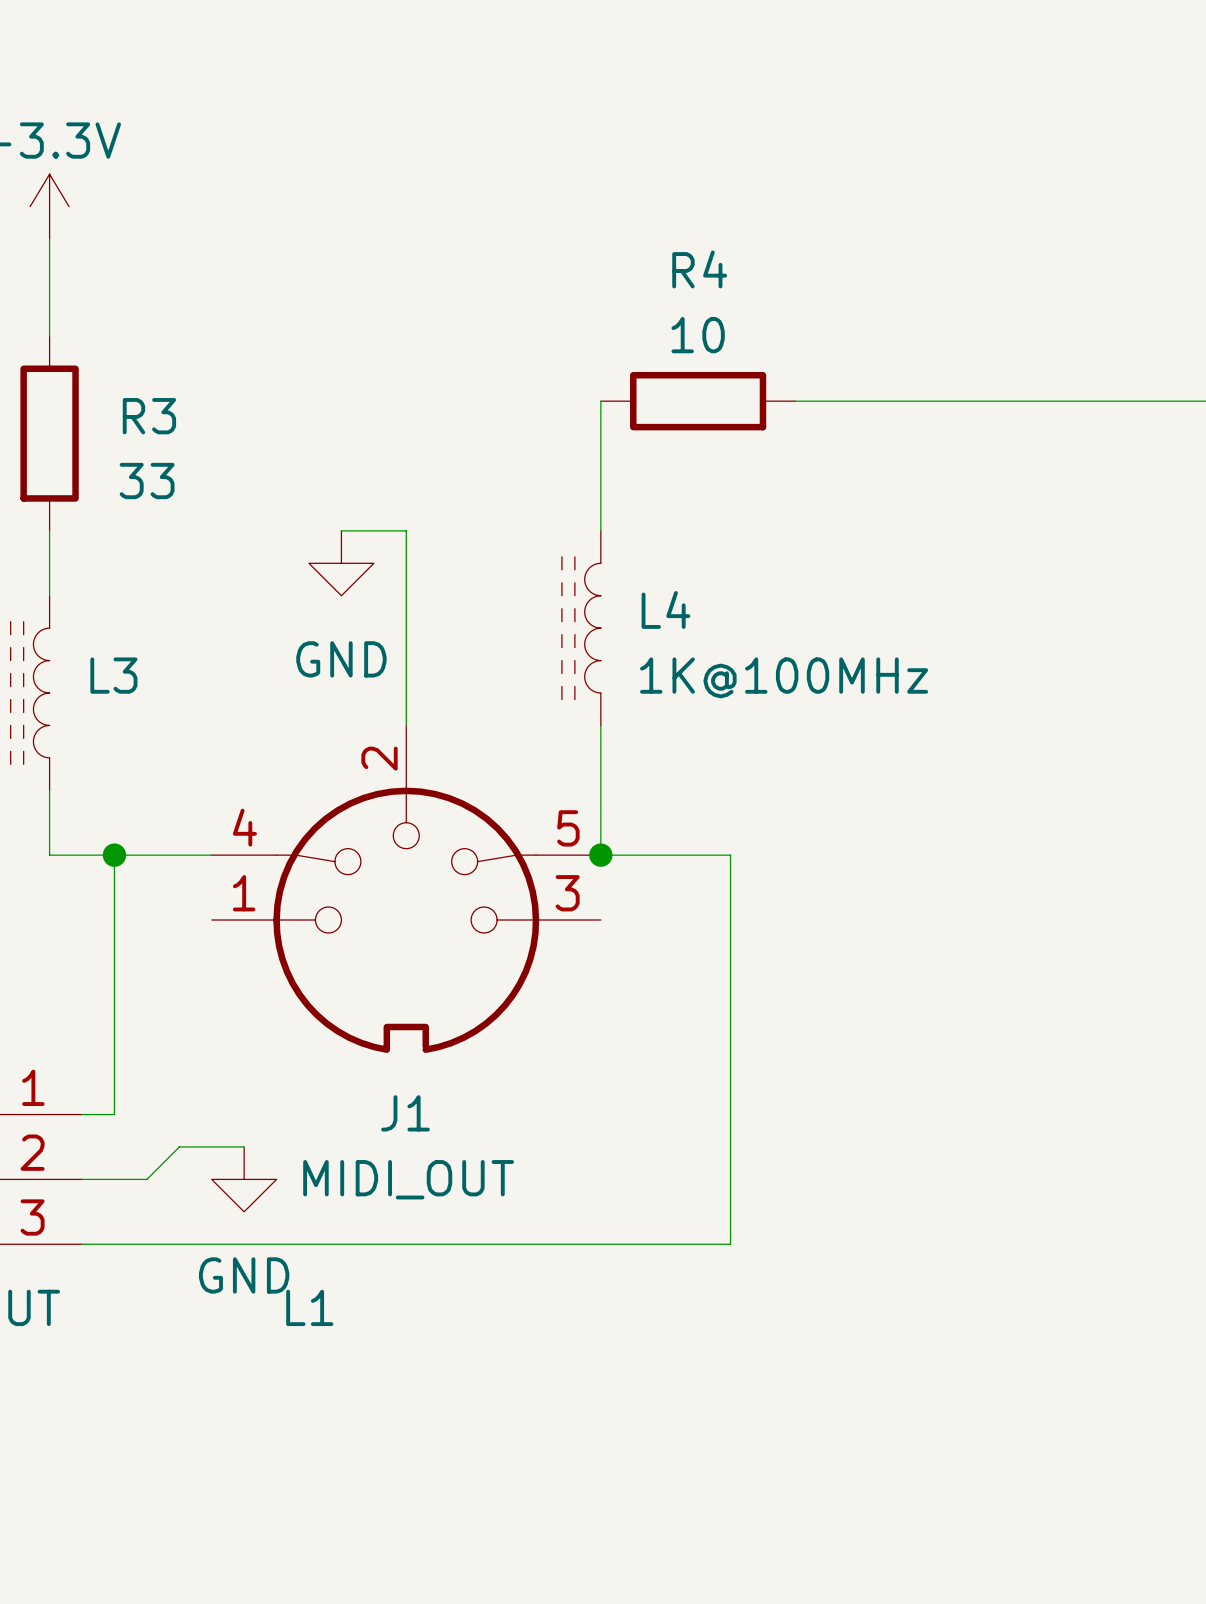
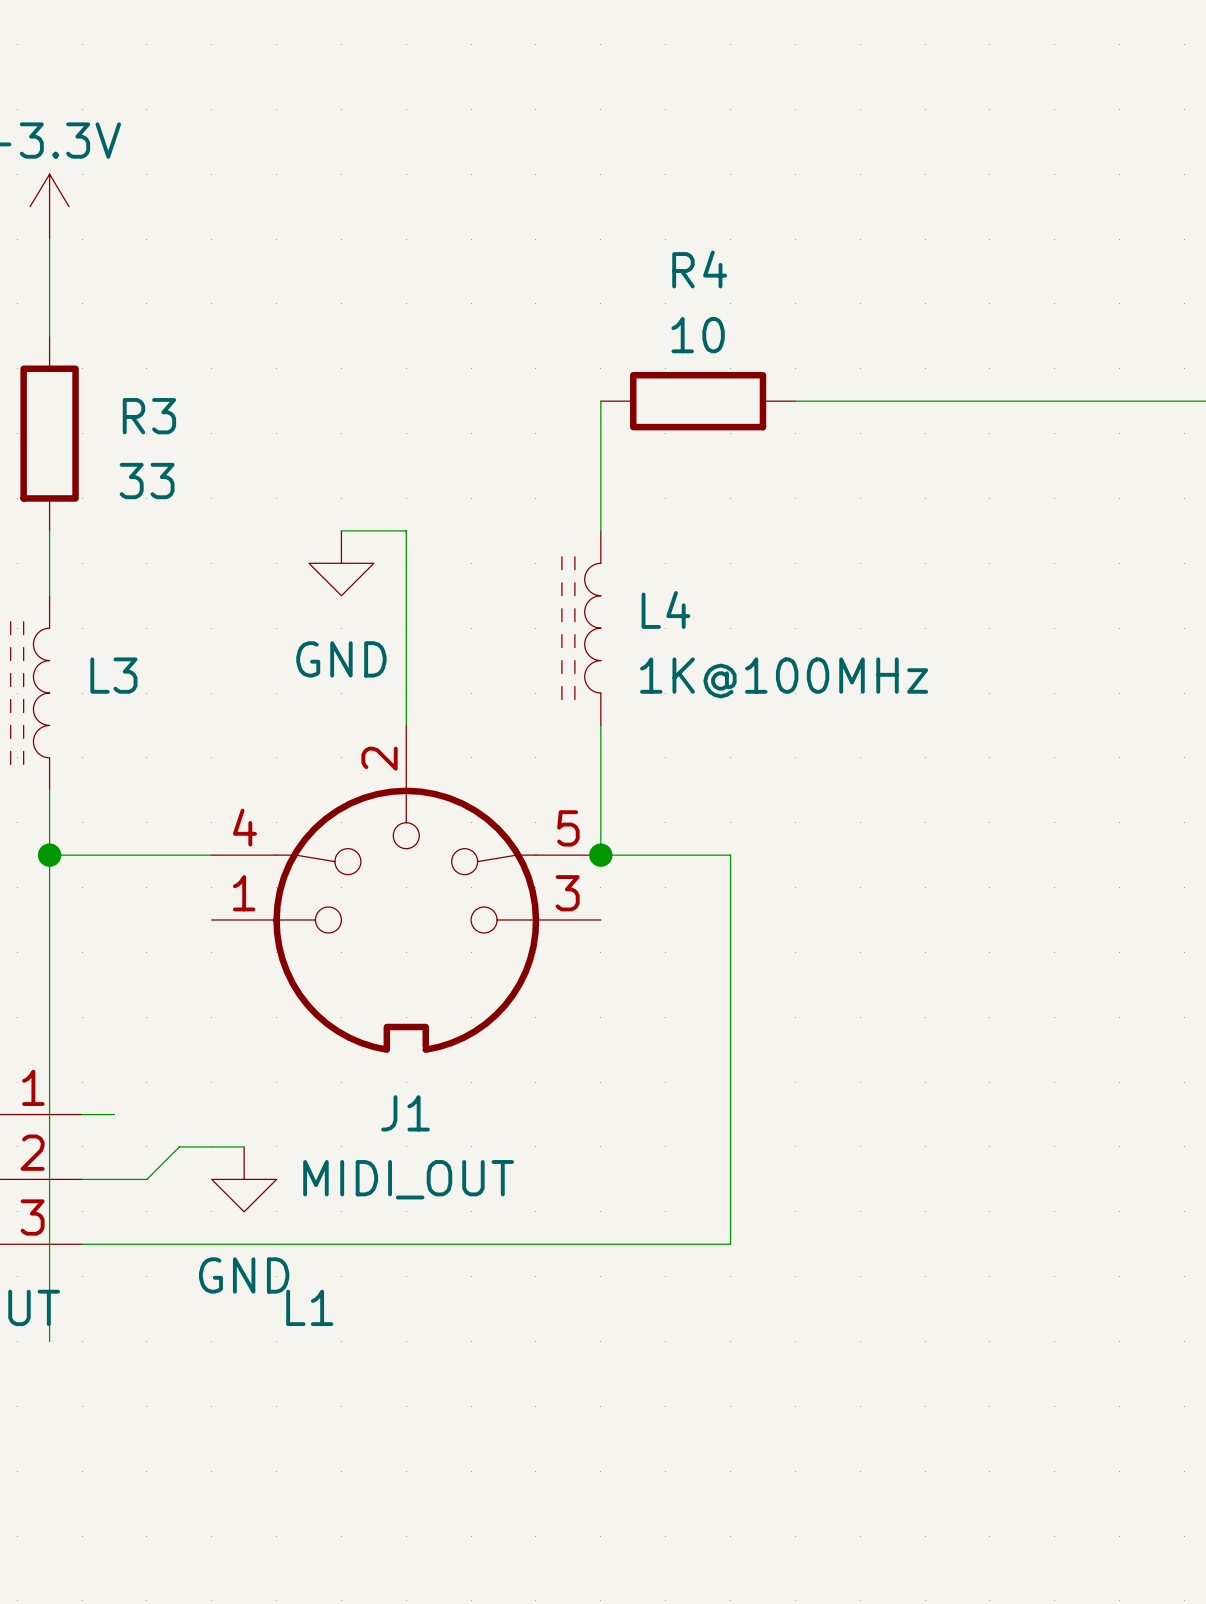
wire: none -> (49, 855) (49, 1341)
wire: (114, 855) (114, 1114) -> none
junction position: (114, 855) -> (49, 855)

